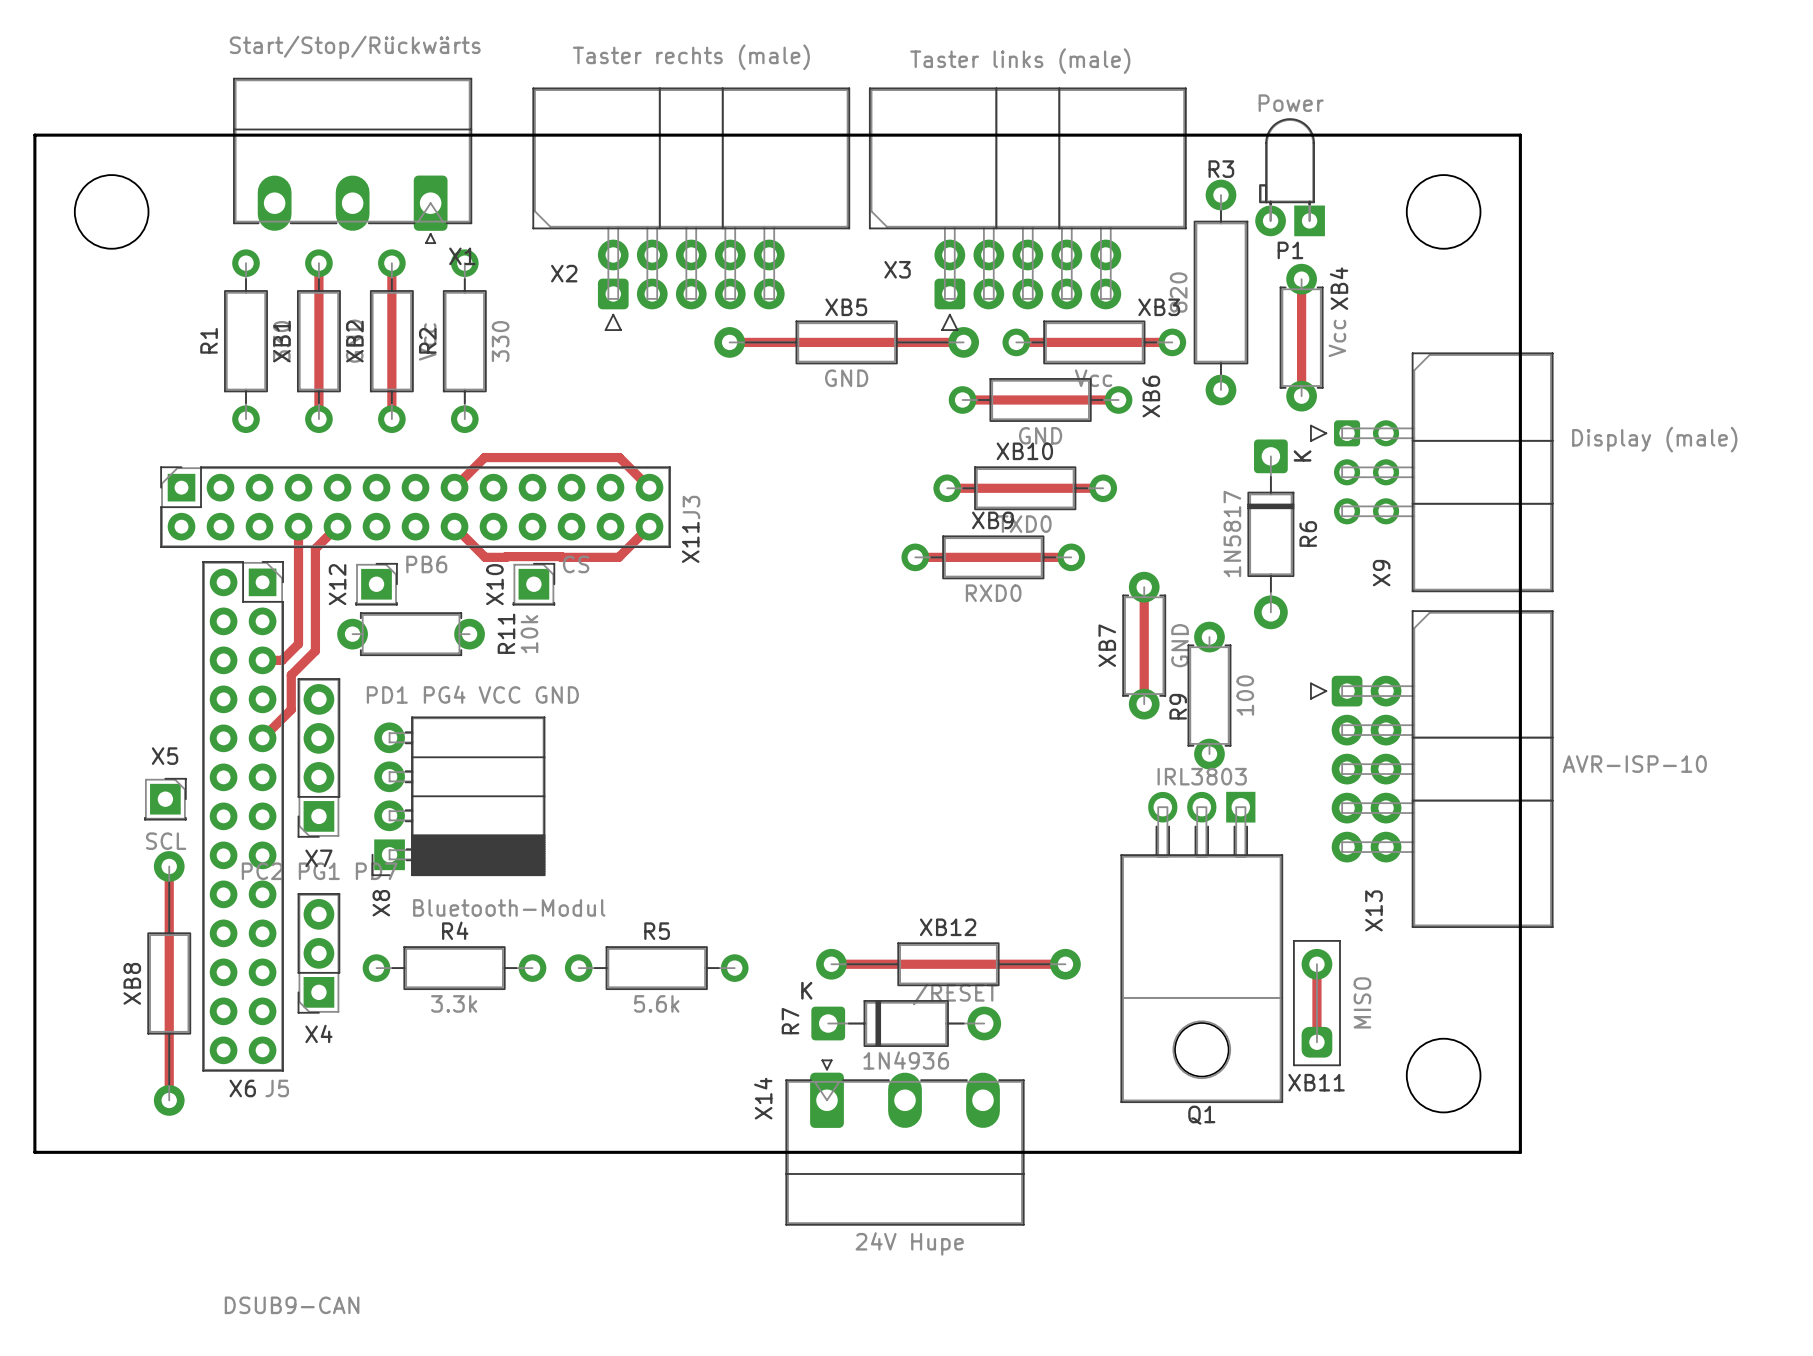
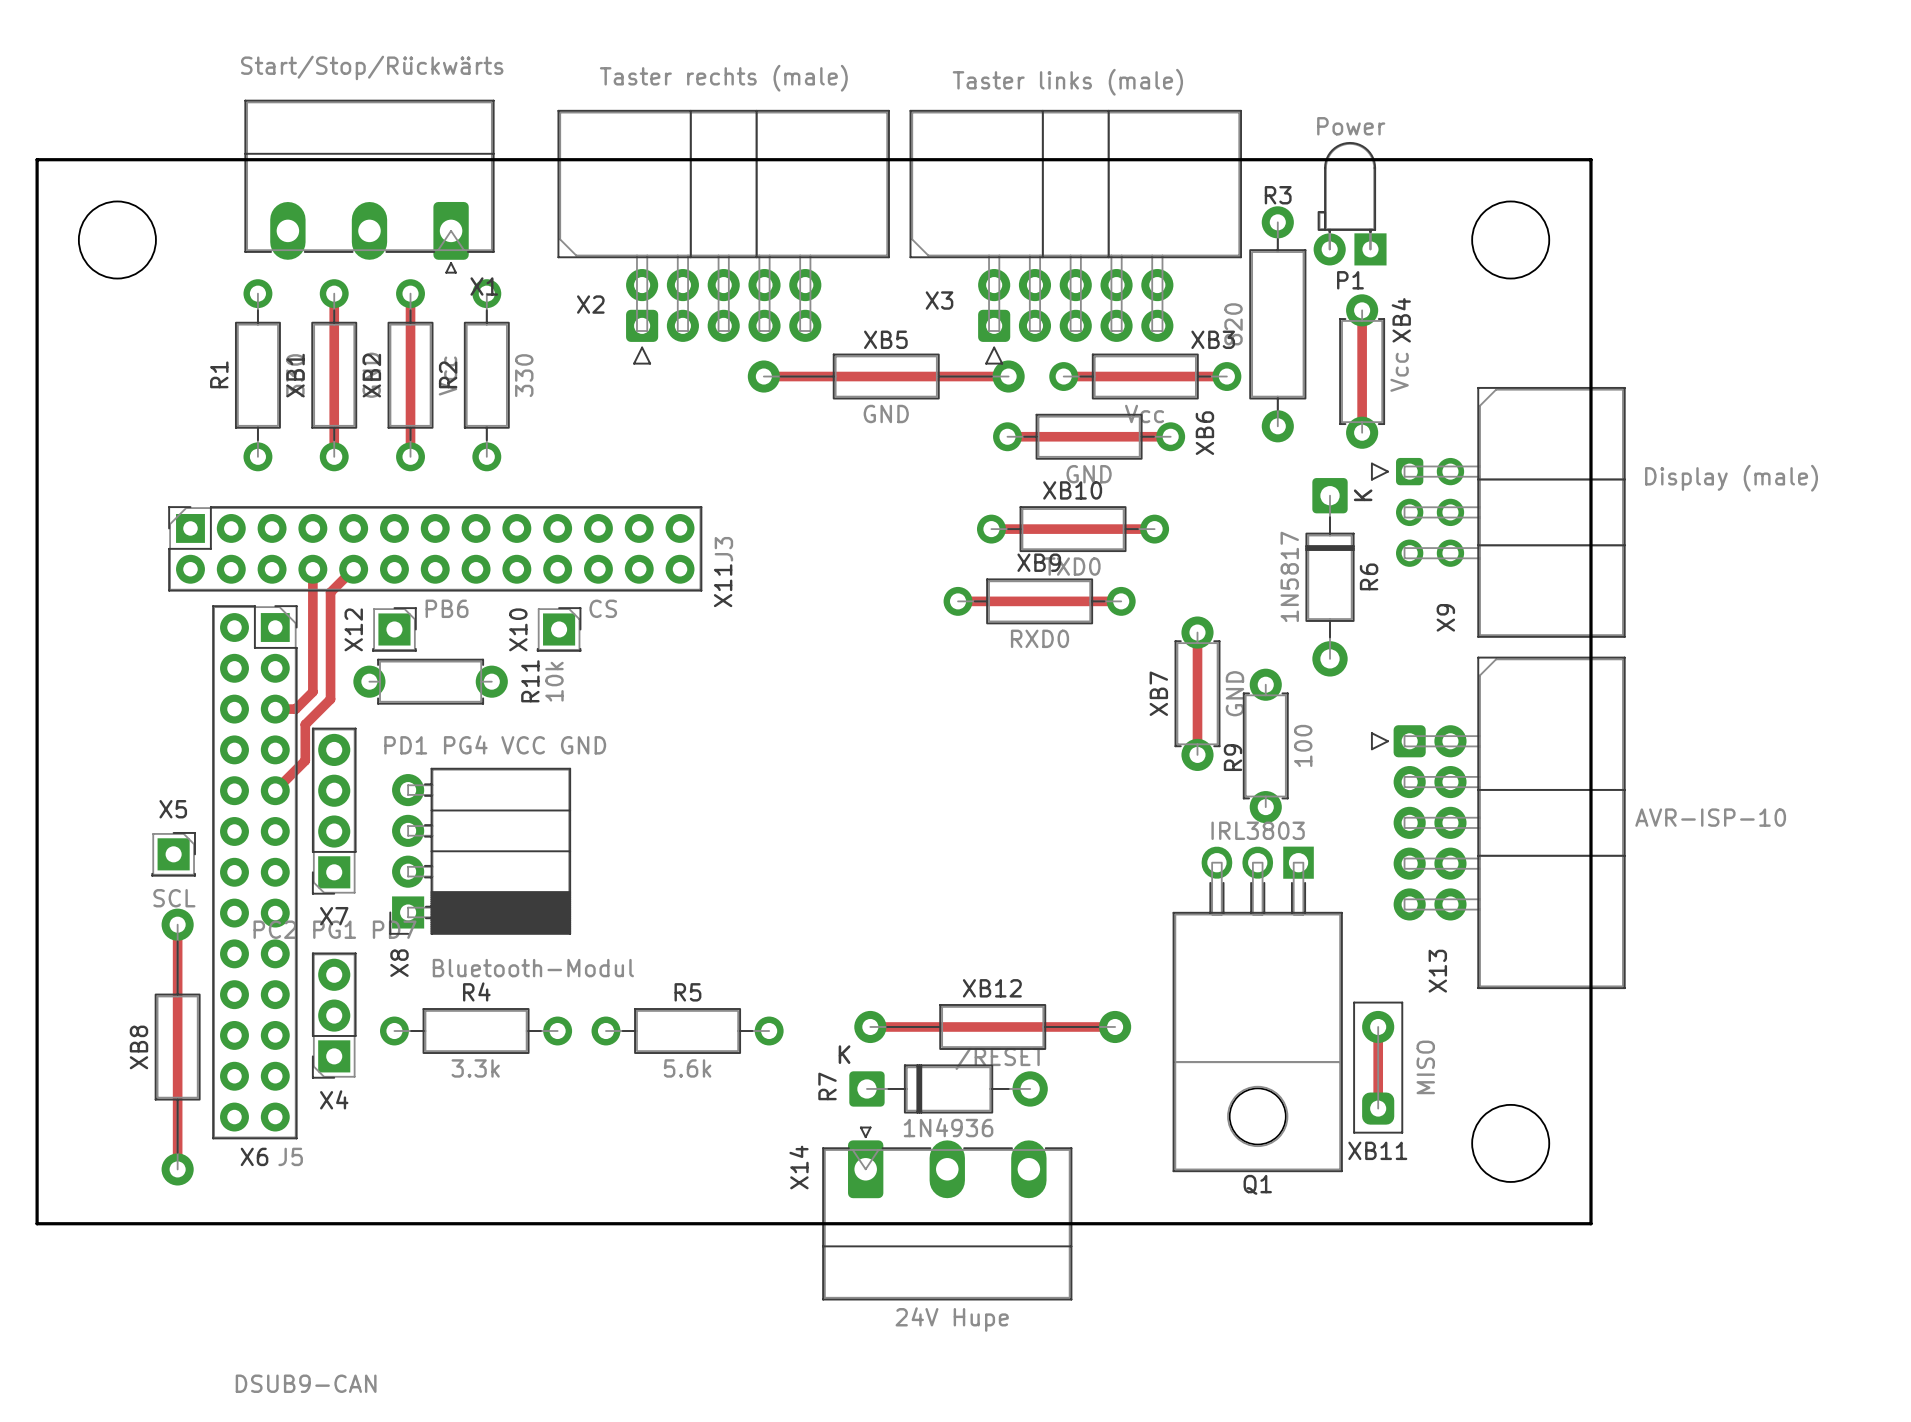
track: (454, 487) (484, 457) (619, 457) (649, 487) -> none
track: (454, 526) (485, 557) (618, 557) (649, 526) -> none

